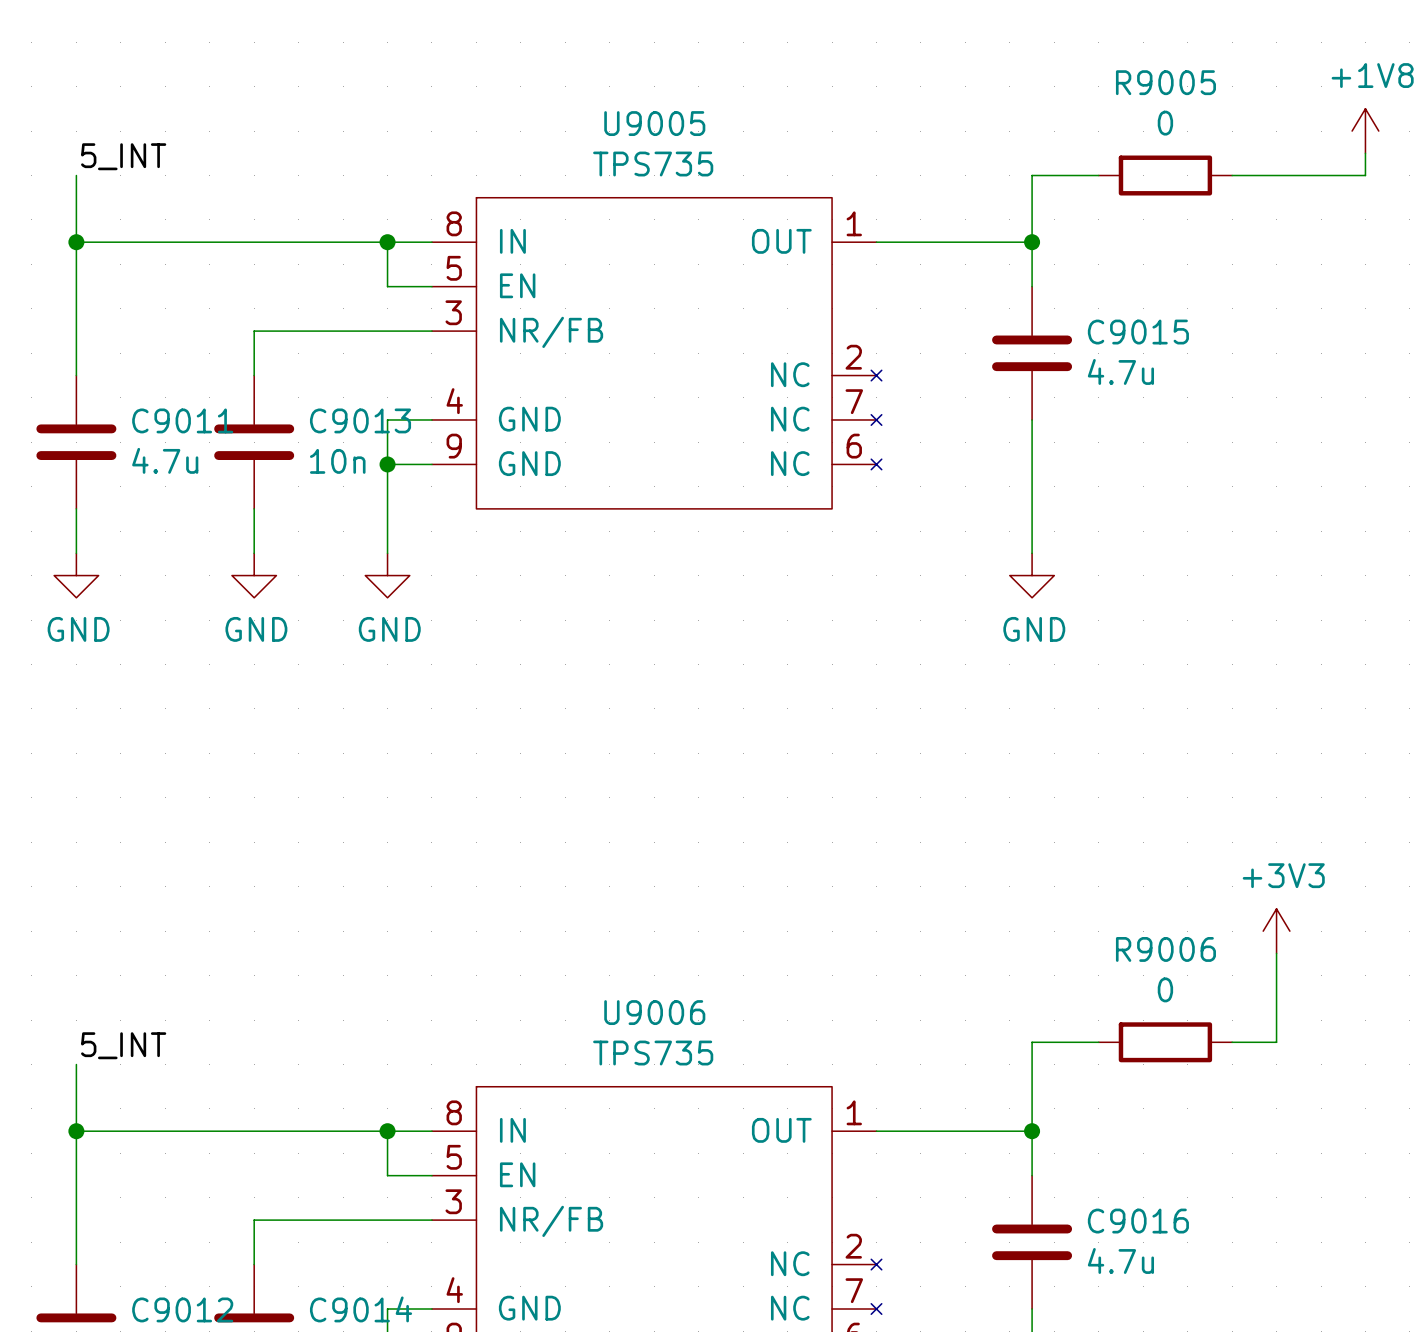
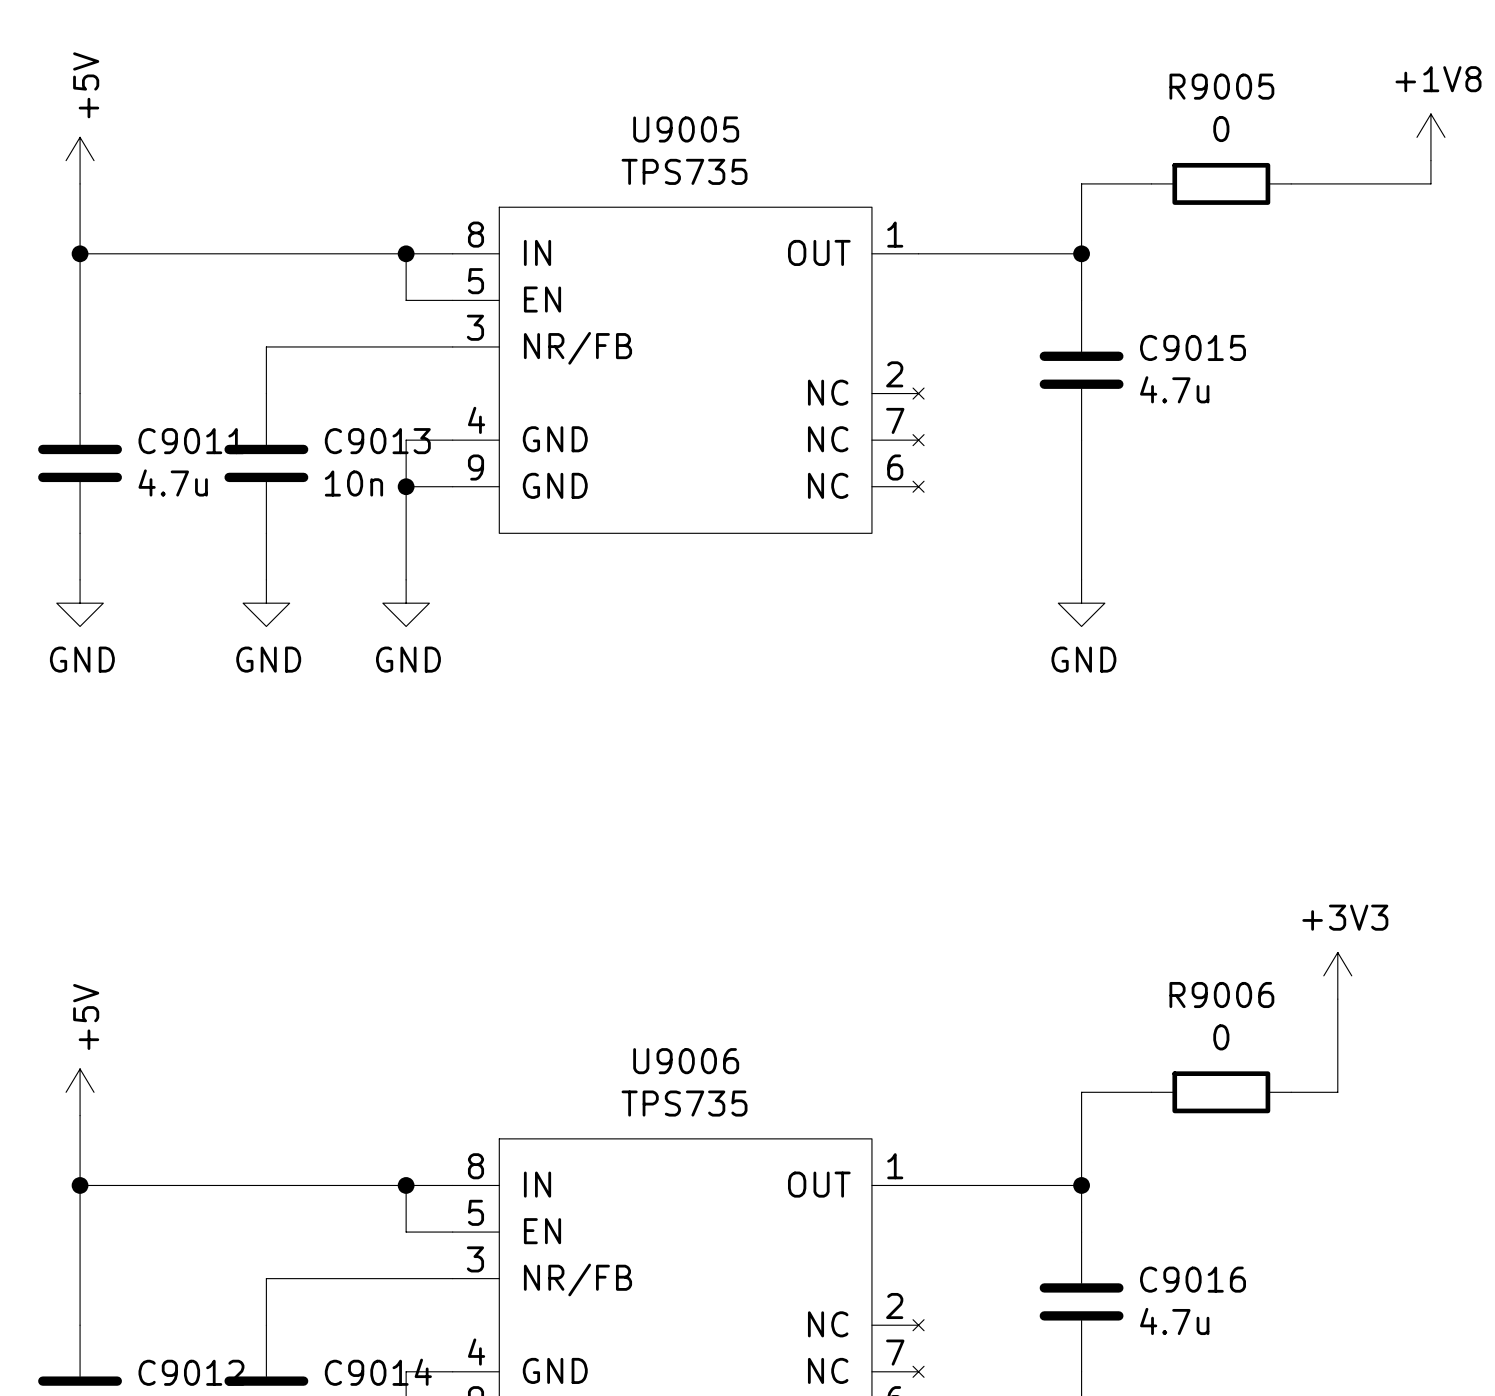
power symbol: none -> +5V (80, 160)
label: 5_INT (123, 156) -> none
power symbol: none -> +5V (80, 1092)
label: 5_INT (123, 1045) -> none

